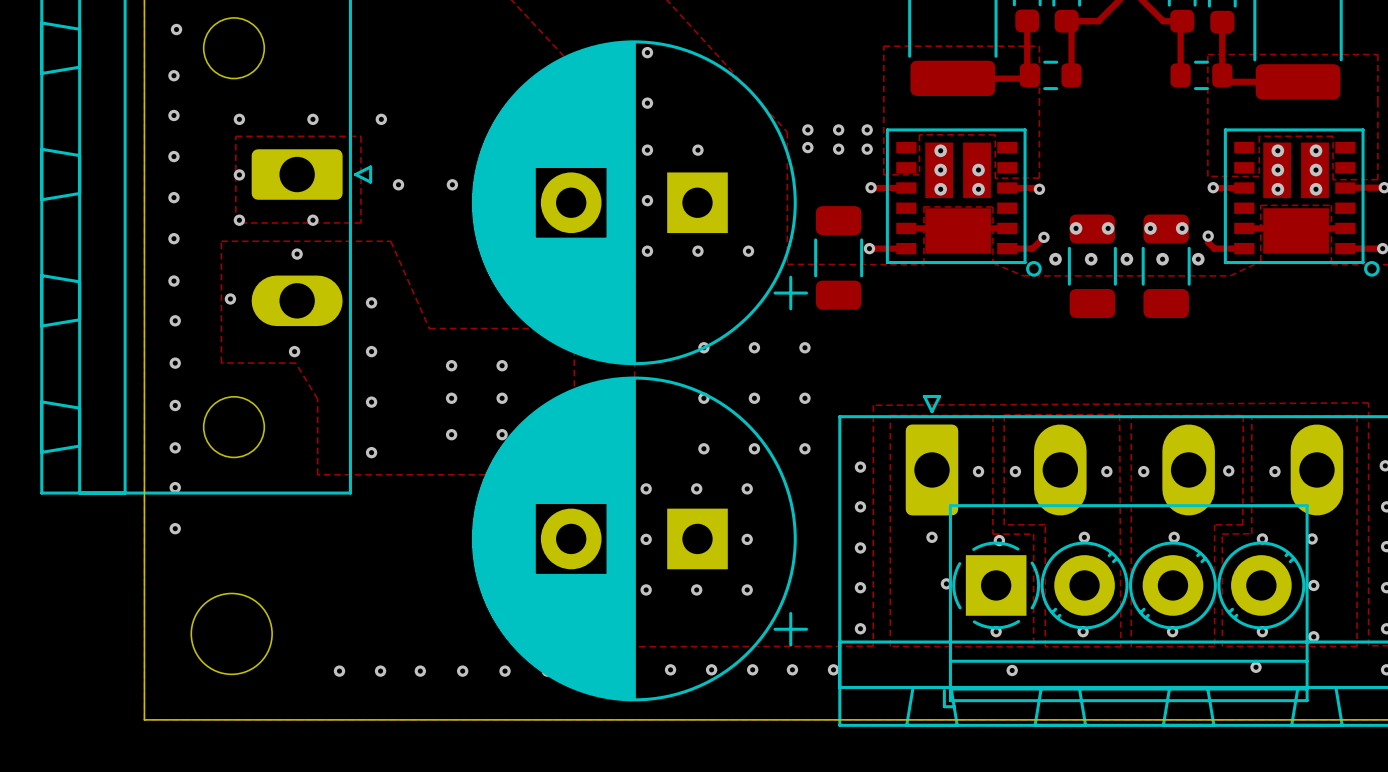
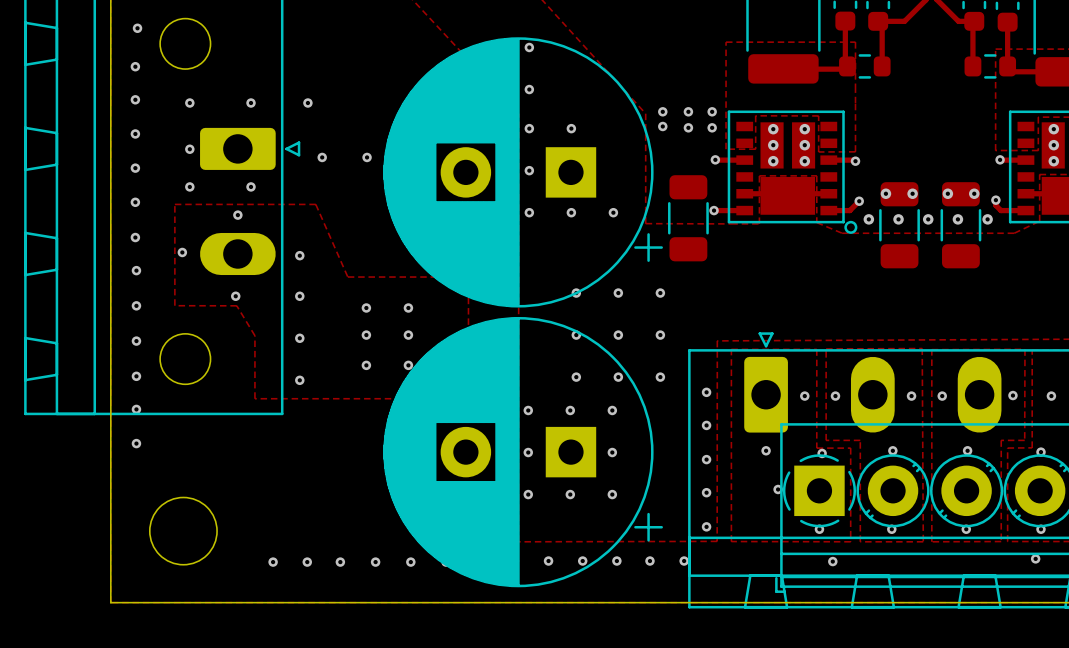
zone outline: (235, 136) (235, 222) (360, 222) (360, 136) (235, 136) -> none
via: none -> (804, 129)

